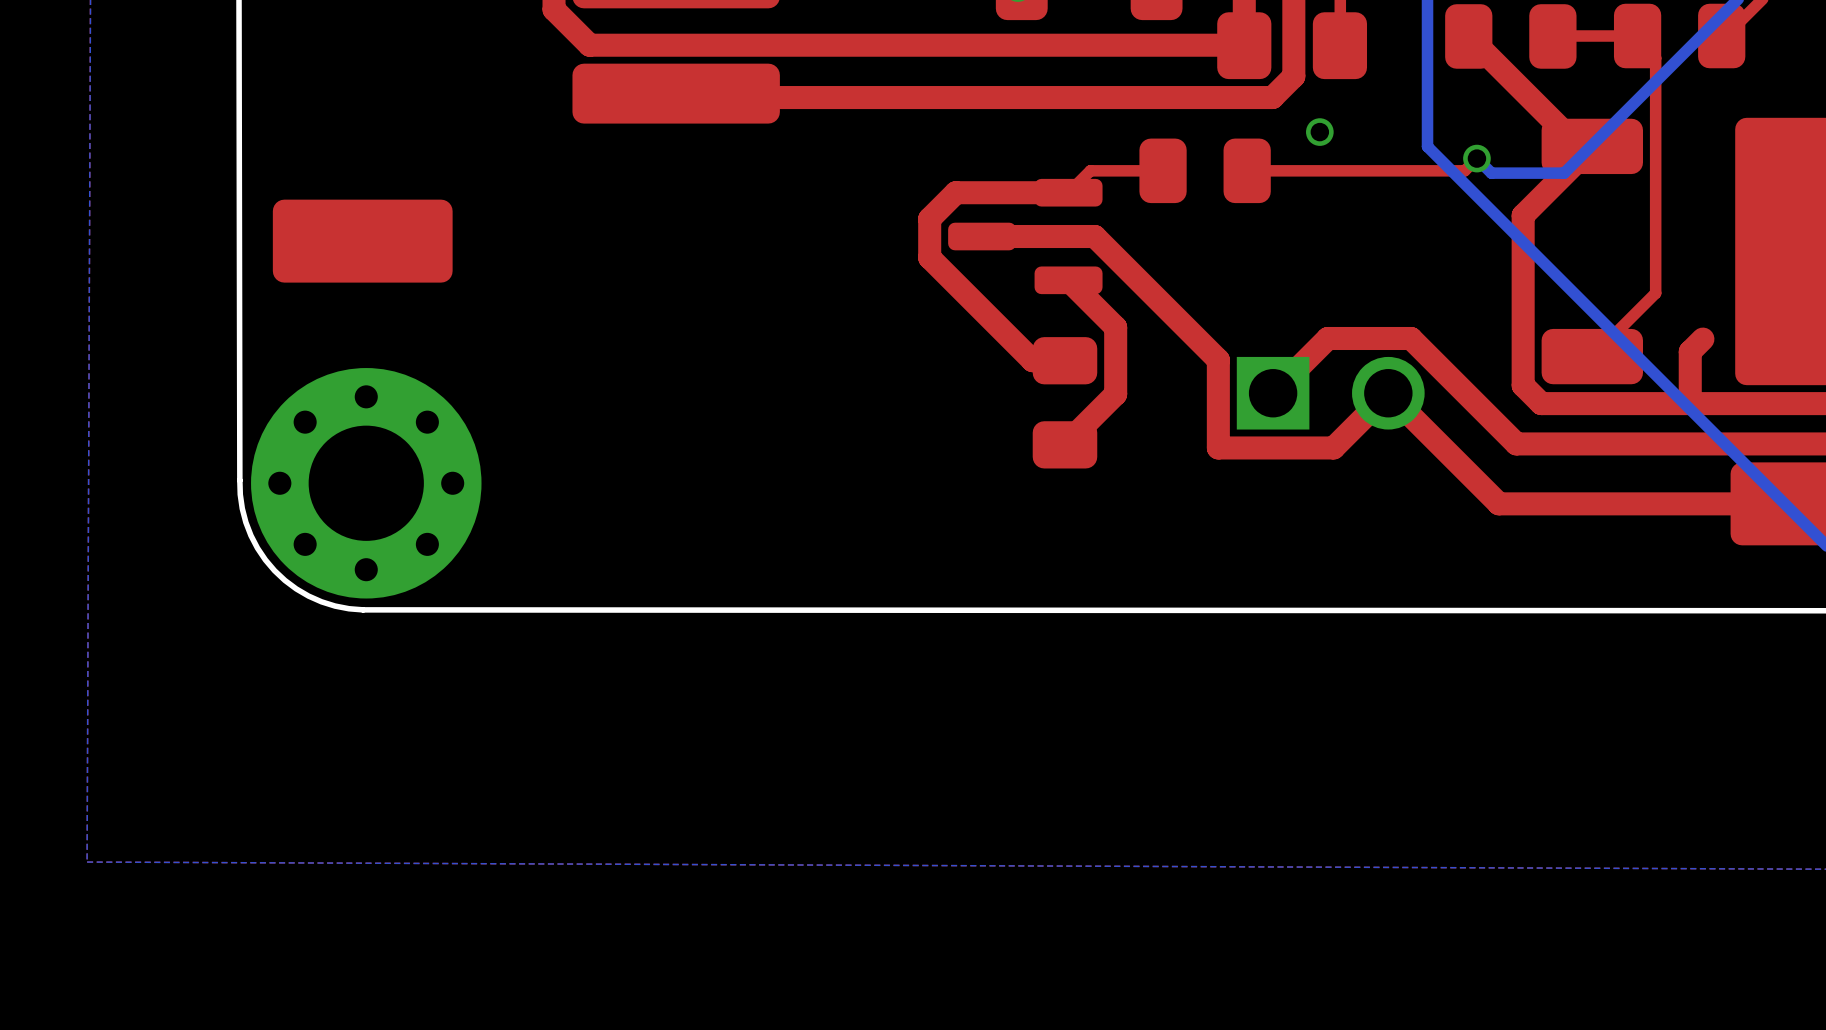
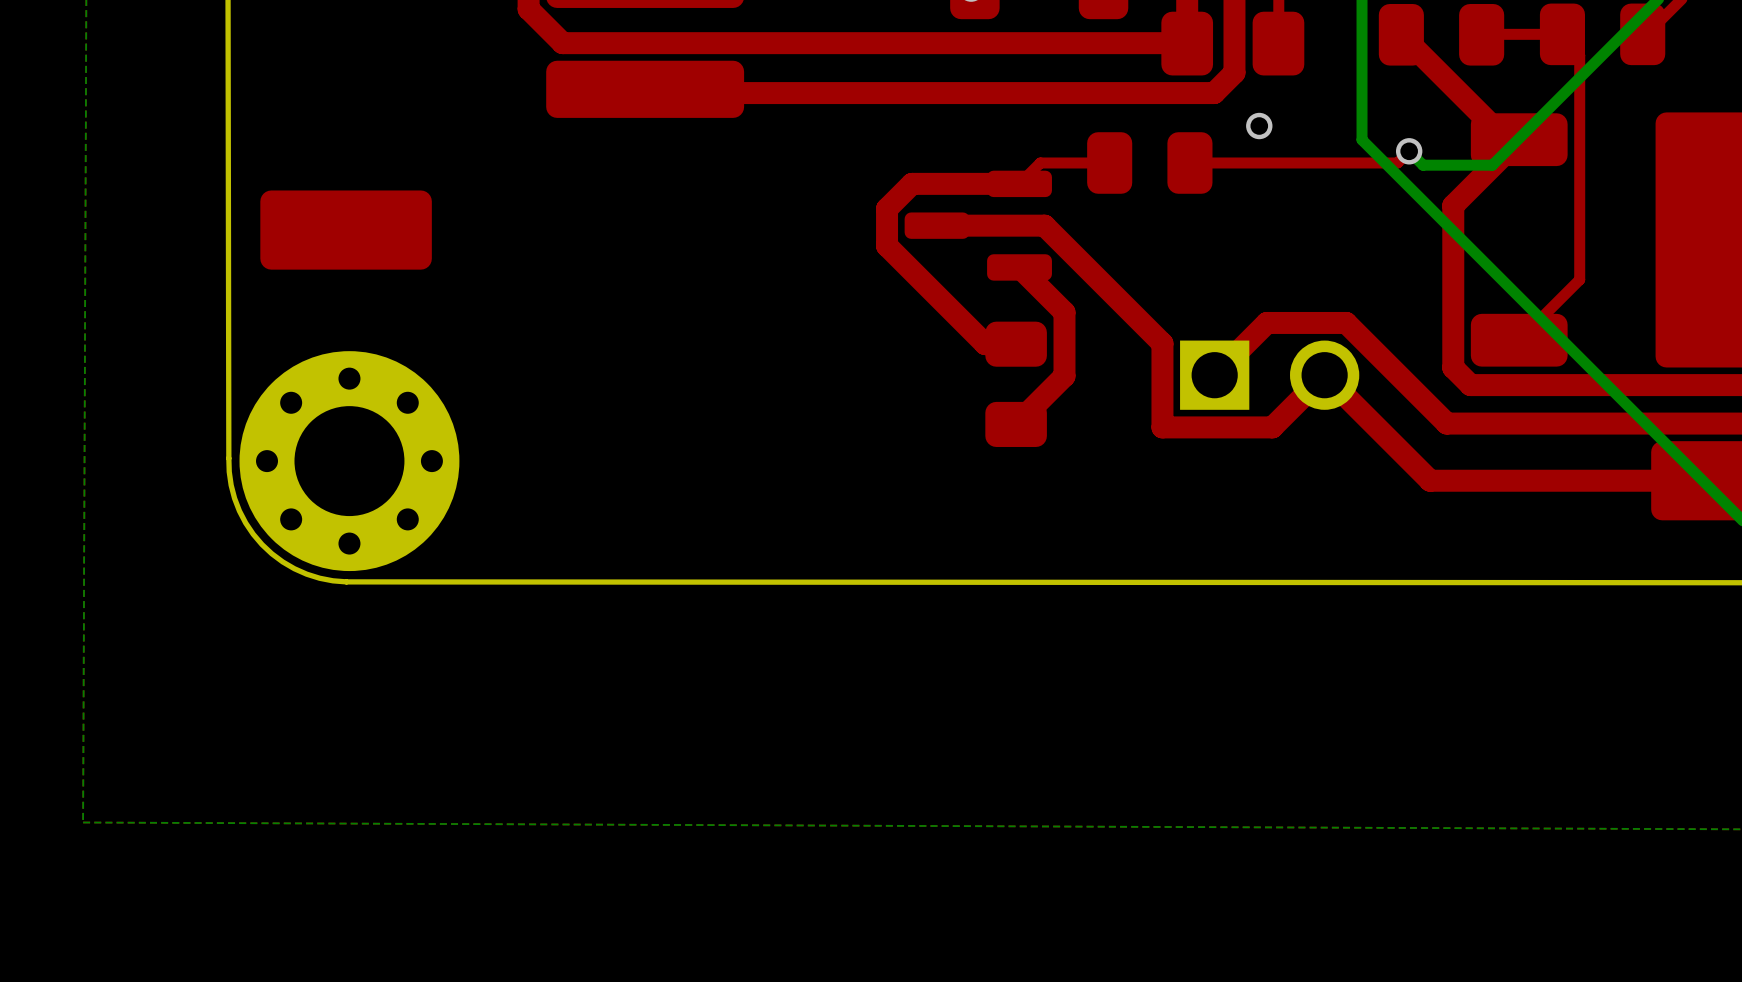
top track: (1702, 339) (1690, 351) (1690, 403) -> none

